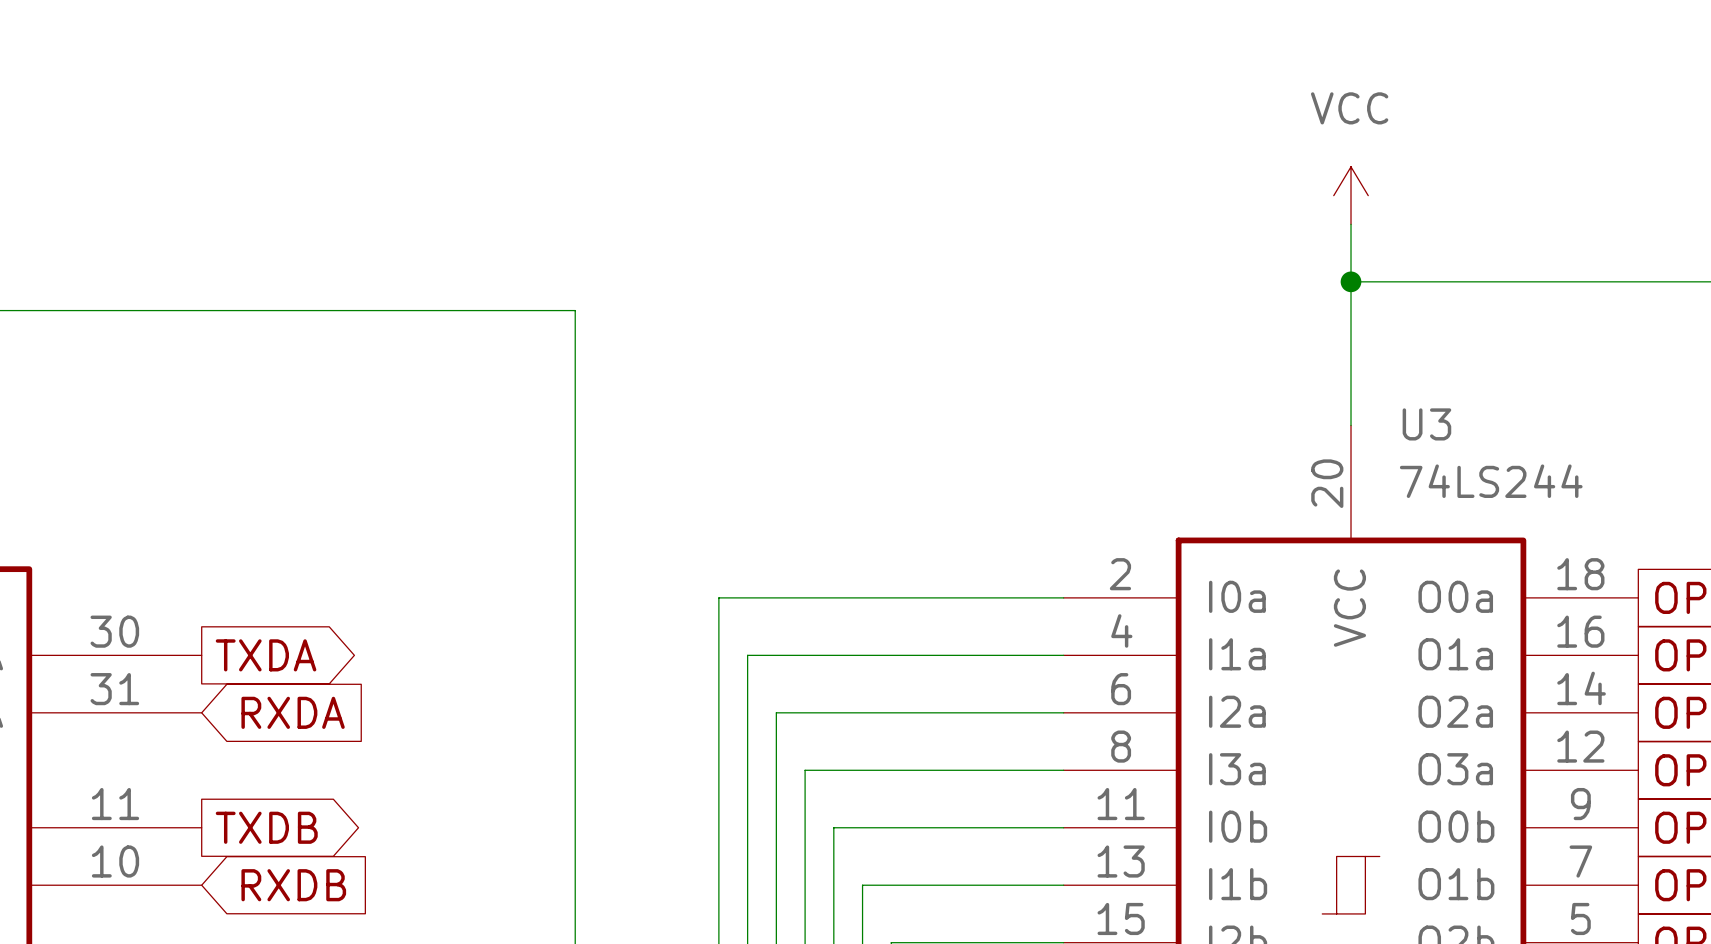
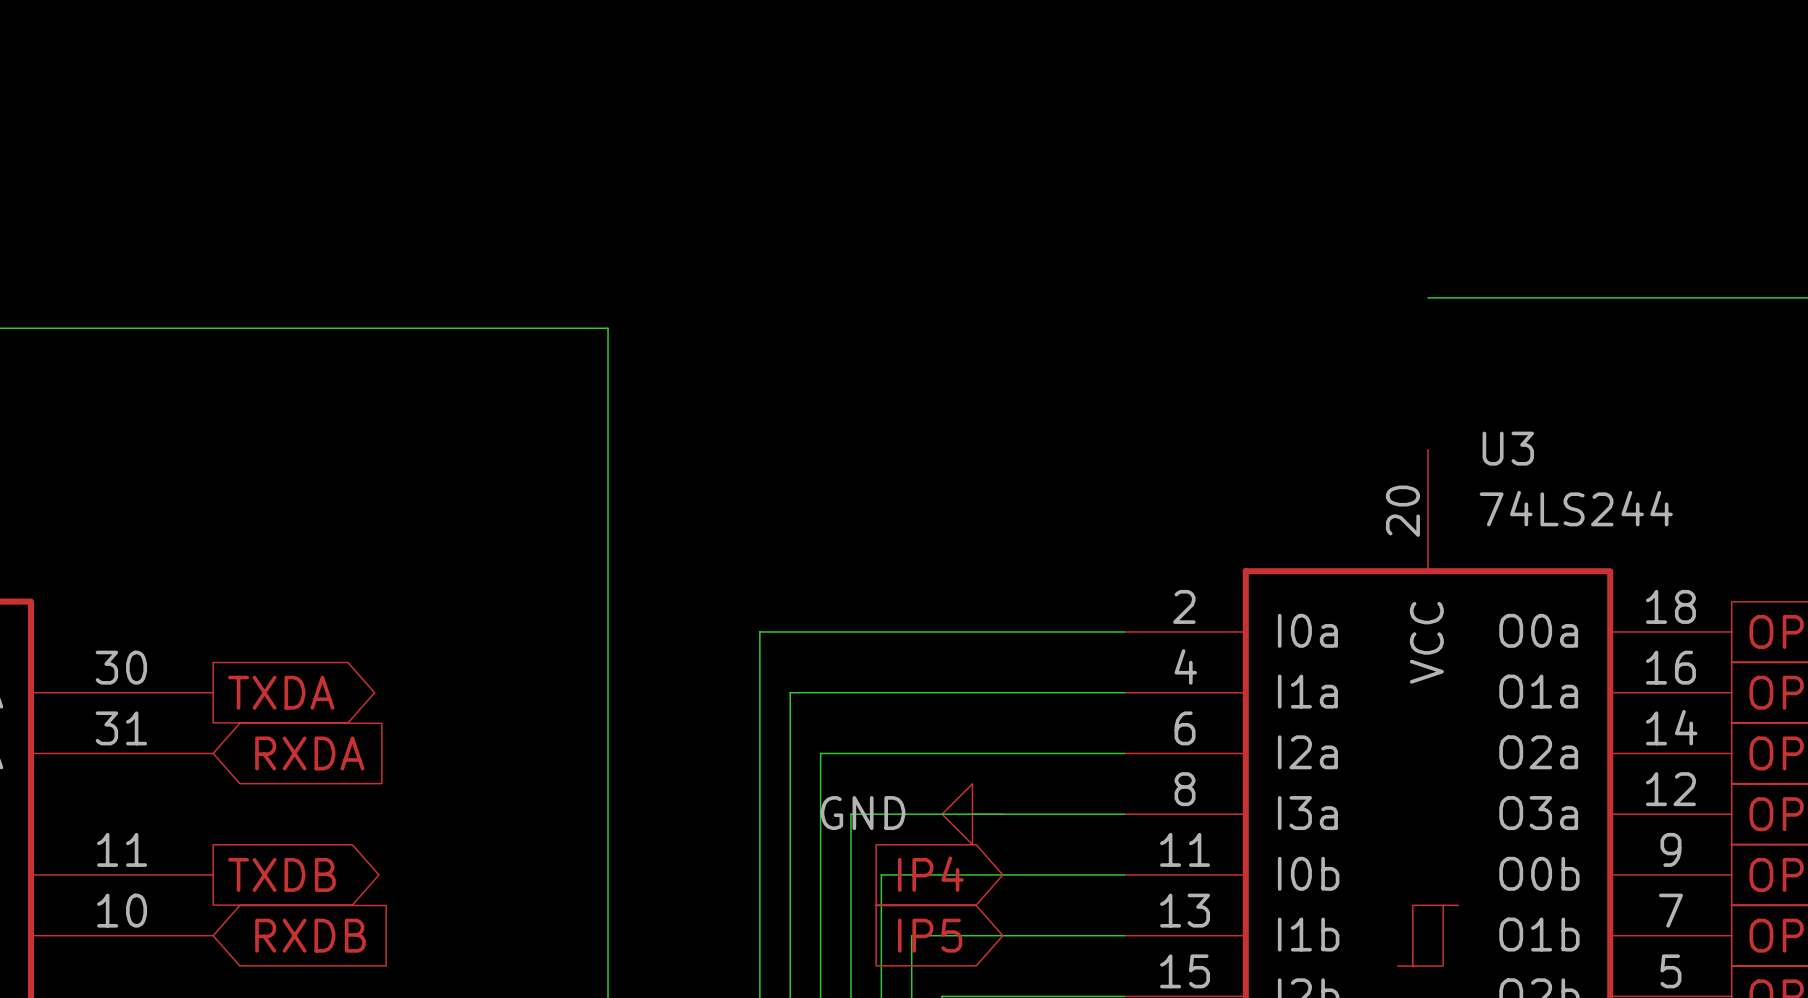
power symbol: VCC (1351, 195) -> none
wire: (1351, 224) (1351, 425) -> none
junction: (1351, 281) -> none
power symbol: none -> GND (972, 814)
global label: none -> IP4 (930, 874)
global label: none -> IP5 (930, 935)

